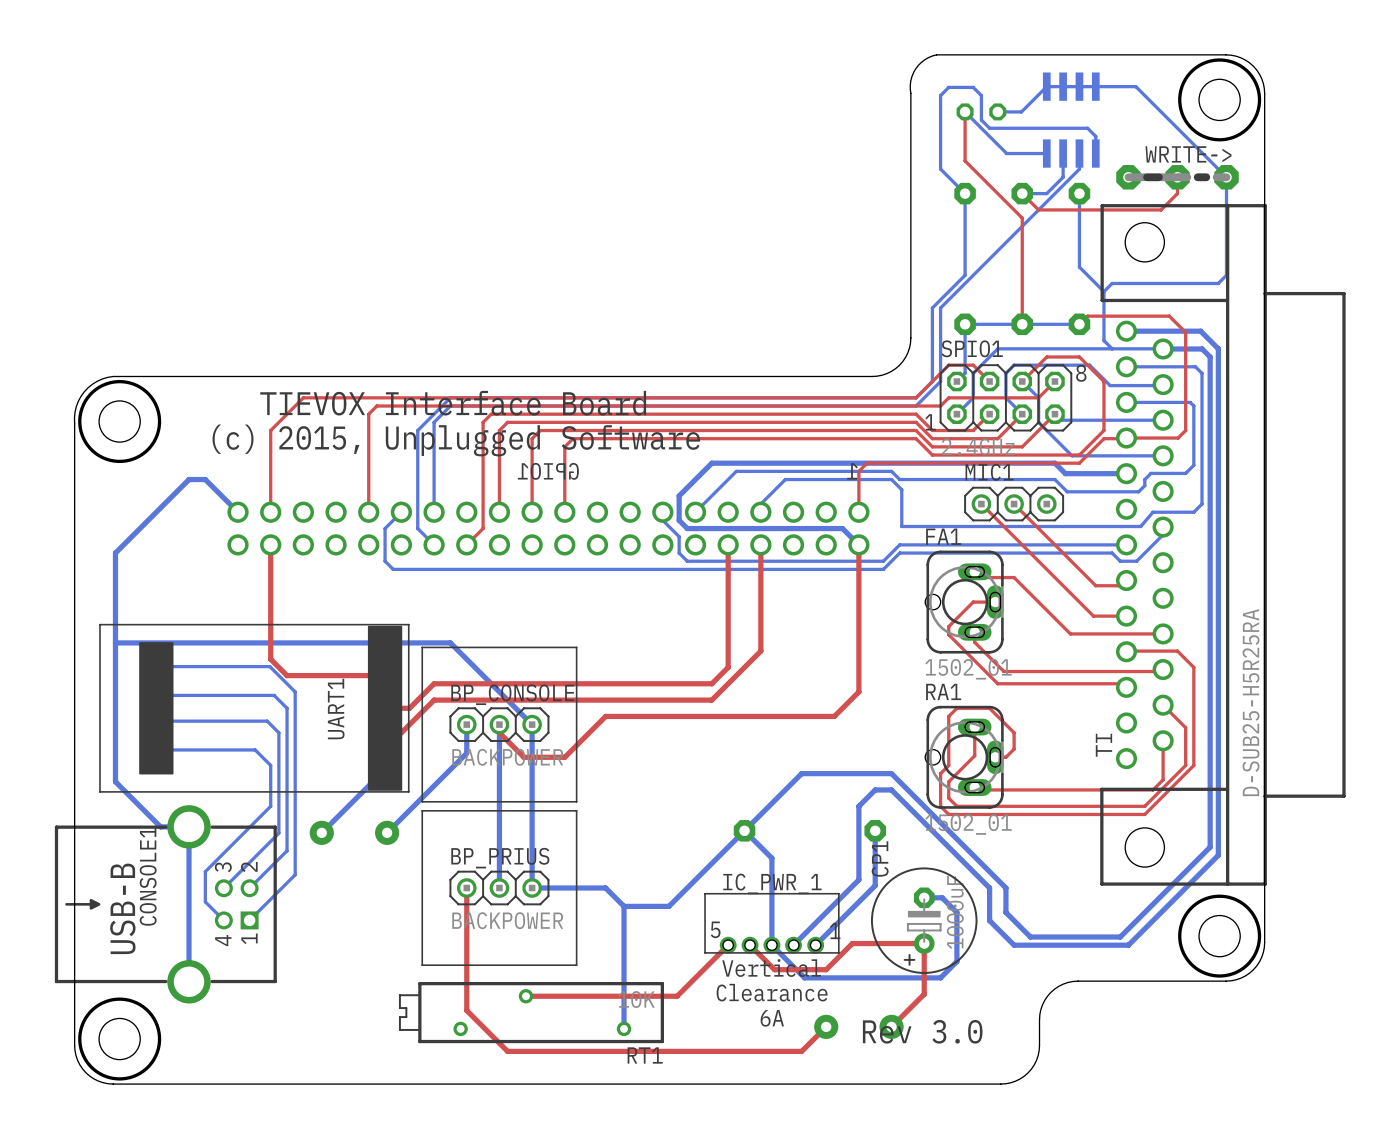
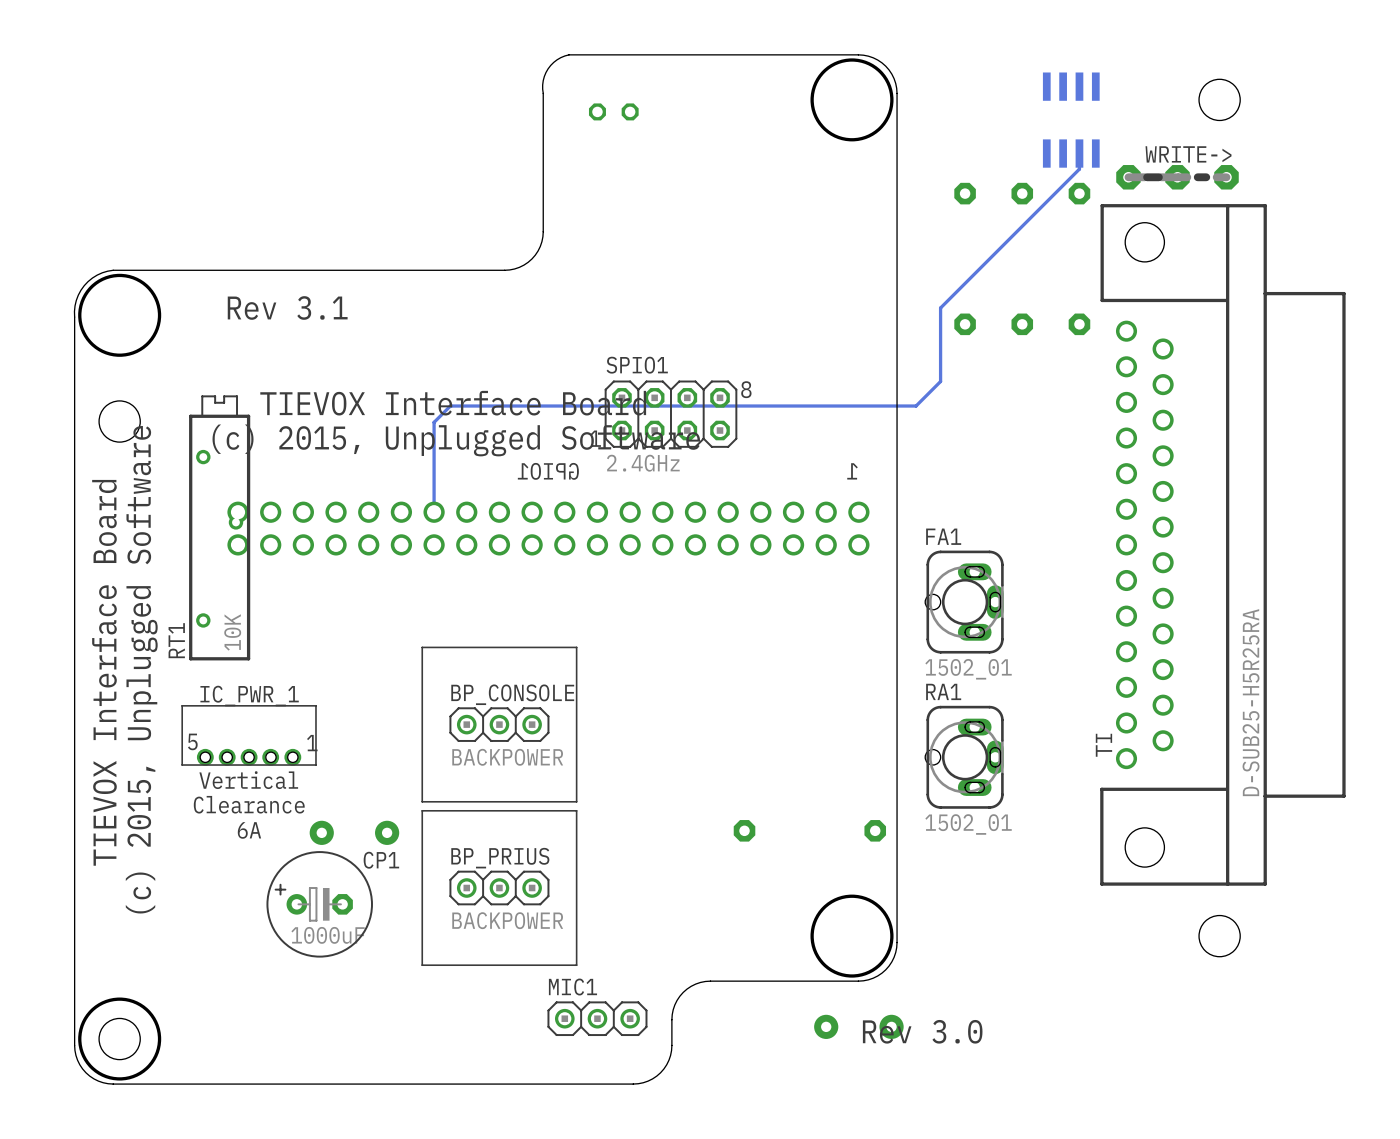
round board edge: none -> [810, 58, 894, 142]
round board edge: [1178, 58, 1262, 142] -> none
part: none -> (613, 111)
bottom track: (965, 111) (1006, 153) (1046, 153) -> none
top track: (965, 111) (965, 160) (1022, 218) (1022, 324) -> none
part: (981, 111) -> none
bottom track: (997, 111) (1021, 111) (1046, 86) (1135, 86) (1226, 177) (1226, 275) (1218, 283) (1112, 283) (1103, 291) -> none
bottom track: (1063, 153) (1063, 177) (1046, 193) (1022, 193) -> none
bottom track: (1095, 153) (1095, 136) (1087, 128) (989, 128) (981, 120) (981, 95) (973, 87) (948, 87) (940, 95) (940, 169) (965, 193) (965, 275) (932, 307) (932, 381) (916, 397) (450, 397) (417, 430) (417, 528) (434, 544) -> none
top track: (1177, 177) (1177, 193) (1161, 209) (1038, 209) (1022, 193) -> none
bottom track: (1079, 193) (1079, 267) (1103, 291) -> none
bottom track: (1103, 291) (1103, 340) (1112, 348) -> none
text: none -> Rev 3.1 (287, 307)
bottom track: (1079, 324) (965, 324) (965, 373) (956, 381) -> none
top track: (1079, 324) (1087, 316) (1169, 316) (1185, 332) (1185, 430) (1178, 438) (1103, 438) (1079, 463) (867, 463) (858, 471) (858, 512) -> none
bottom track: (1126, 331) (1200, 331) (1218, 348) (1218, 855) (1128, 945) (1014, 945) (989, 920) (989, 888) (891, 789) (875, 789) (858, 806) (858, 879) (793, 945) -> none
bottom track: (1162, 348) (997, 348) (973, 373) (973, 397) (956, 414) -> none
bottom track: (1163, 348) (1202, 348) (1210, 357) (1210, 847) (1120, 937) (1030, 937) (1005, 912) (1005, 888) (891, 773) (801, 773) (668, 906) (624, 906) -> none
bottom track: (1126, 366) (1195, 366) (1202, 373) (1202, 504) (1193, 512) (1152, 512) (1140, 526) (901, 526) (901, 489) (891, 479) (785, 479) (760, 504) (760, 512) -> none
top track: (989, 381) (973, 365) (948, 365) (916, 397) (303, 397) (270, 430) (270, 512) -> none
bottom track: (1022, 381) (1038, 397) (1038, 422) (1072, 455) (1163, 455) -> none
top track: (1022, 381) (1046, 357) (1079, 357) (1103, 381) (1103, 430) (1079, 455) (932, 455) (916, 438) (572, 438) (564, 446) (564, 512) -> none
top track: (1054, 381) (1038, 397) (948, 397) (940, 406) (376, 406) (368, 414) (368, 512) -> none
bottom track: (1163, 384) (1110, 385) (1089, 365) (1014, 365) (1005, 373) (1005, 397) (1022, 414) -> none
SPIO1 position: (1005, 397) -> (670, 414)
bottom track: (1126, 402) (1190, 402) (1193, 406) (1193, 465) (1185, 473) (1150, 473) (1144, 479) (1144, 485) (1138, 491) (1067, 491) (1054, 479) (899, 479) (891, 471) (736, 471) (695, 512) -> none
top track: (989, 414) (973, 430) (932, 430) (916, 414) (491, 414) (483, 422) (483, 528) (466, 544) -> none
top track: (1022, 414) (997, 438) (932, 438) (916, 422) (507, 422) (499, 430) (499, 512) -> none
bottom track: (1054, 414) (1060, 420) (1163, 420) -> none
top track: (1054, 414) (1022, 446) (932, 446) (916, 430) (540, 430) (532, 438) (532, 512) -> none
round board edge position: (119, 421) -> (119, 315)
board edge: (74, 423) (76, 406) (84, 391) (97, 381) (113, 376) (882, 375) (895, 368) (902, 361) (910, 342) (910, 84) (913, 72) (921, 62) (936, 54) (1226, 54) (1245, 60) (1256, 69) (1263, 83) (1264, 93) (1264, 942) (1259, 961) (1249, 973) (1231, 980) (1078, 981) (1063, 984) (1050, 992) (1042, 1004) (1039, 1014) (1039, 1050) (1034, 1064) (1024, 1076) (1005, 1083) (633, 1084) -> (74, 423) (75, 305) (84, 285) (102, 272) (113, 270) (504, 270) (514, 268) (528, 262) (538, 250) (542, 236) (543, 80) (550, 65) (560, 57) (568, 54) (858, 54) (877, 60) (889, 69) (895, 83) (897, 93) (895, 952) (889, 966) (881, 973) (863, 980) (710, 981) (691, 986) (679, 996) (673, 1009) (671, 1050) (666, 1064) (652, 1078) (633, 1084)
bottom track: (1126, 473) (1065, 473) (1054, 463) (711, 463) (679, 495) (679, 520) (687, 528) (842, 528) (858, 544) -> none
top track: (981, 504) (1093, 616) (1126, 616) -> none
top track: (1014, 504) (1095, 585) (1128, 585) (1126, 580) -> none
MIC1 position: (1014, 504) -> (597, 1018)
bottom track: (238, 512) (205, 479) (189, 479) (115, 553) (115, 781) (160, 826) (189, 826) (189, 981) -> none
bottom track: (401, 512) (385, 528) (385, 561) (393, 569) (883, 569) (899, 553) (1112, 553) (1120, 561) (1136, 561) (1163, 534) (1163, 527) -> none
bottom track: (662, 512) (662, 520) (679, 536) (679, 553) (687, 561) (883, 561) (899, 544) (1126, 544) -> none
top track: (270, 544) (270, 659) (287, 675) (385, 675) -> none
top track: (728, 544) (728, 667) (711, 683) (434, 683) (409, 708) (385, 708) -> none
top track: (760, 544) (760, 651) (711, 700) (434, 700) (393, 740) (385, 740) -> none
top track: (858, 544) (858, 691) (834, 716) (605, 716) (564, 757) (523, 757) (499, 732) (499, 724) -> none
top track: (974, 571) (980, 577) (1014, 577) (1070, 633) (1163, 633) -> none
top track: (995, 602) (973, 602) (948, 626) (948, 634) (997, 683) (1122, 683) (1126, 687) -> none
top track: (974, 632) (974, 642) (1003, 671) (1161, 671) (1163, 669) -> none
bottom track: (115, 642) (450, 642) (532, 724) (532, 888) (605, 888) (624, 906) -> none
top track: (1126, 651) (1177, 651) (1193, 667) (1193, 765) (1144, 814) (948, 814) (940, 806) (940, 773) (948, 765) (948, 716) (956, 708) (989, 708) (1014, 732) (1014, 749) (1005, 757) (995, 757) -> none
bottom track: (156, 666) (269, 666) (295, 691) (295, 874) (249, 920) -> none
text: none -> (c) 2015, Unplugged Software (141, 669)
text: none -> TIEVOX Interface Board (104, 672)
bottom track: (156, 695) (274, 695) (287, 708) (287, 850) (249, 888) -> none
top track: (1163, 705) (1185, 727) (1185, 765) (1144, 806) (956, 806) (948, 798) (948, 781) (974, 755) (974, 727) -> none
UART1: (254, 708) -> none
bottom track: (156, 721) (267, 721) (278, 732) (278, 833) (223, 888) -> none
bottom track: (466, 724) (466, 753) (387, 832) -> none
bottom track: (499, 724) (499, 888) -> none
top track: (1163, 740) (1163, 779) (1152, 789) (977, 789) (974, 787) -> none
bottom track: (156, 749) (255, 749) (270, 765) (270, 806) (205, 871) (205, 901) (223, 920) -> none
bottom track: (385, 773) (380, 773) (321, 832) -> none
bottom track: (744, 830) (771, 858) (771, 945) (804, 977) (940, 977) (956, 961) (956, 912) (942, 897) (924, 897) -> none
bottom track: (875, 830) (875, 885) (815, 945) -> none
top track: (466, 888) (466, 1010) (507, 1051) (801, 1051) (826, 1026) -> none
round board edge: none -> [810, 894, 894, 978]
round board edge: [1178, 894, 1262, 978] -> none
CONSOLE1: (165, 904) -> none
bottom track: (624, 906) (624, 1028) -> none
CP1 rotation: 0° (924, 920) -> 90° clockwise (319, 904)
CP1 position: (924, 920) -> (319, 904)
IC_PWR_1 position: (771, 923) -> (249, 735)
top track: (728, 945) (677, 996) (525, 996) -> none
top track: (750, 945) (774, 969) (826, 969) (852, 943) (924, 943) (924, 994) (891, 1026) -> none
RT1 rotation: 0° (531, 1012) -> 90° clockwise (219, 527)
RT1 position: (531, 1012) -> (219, 527)

